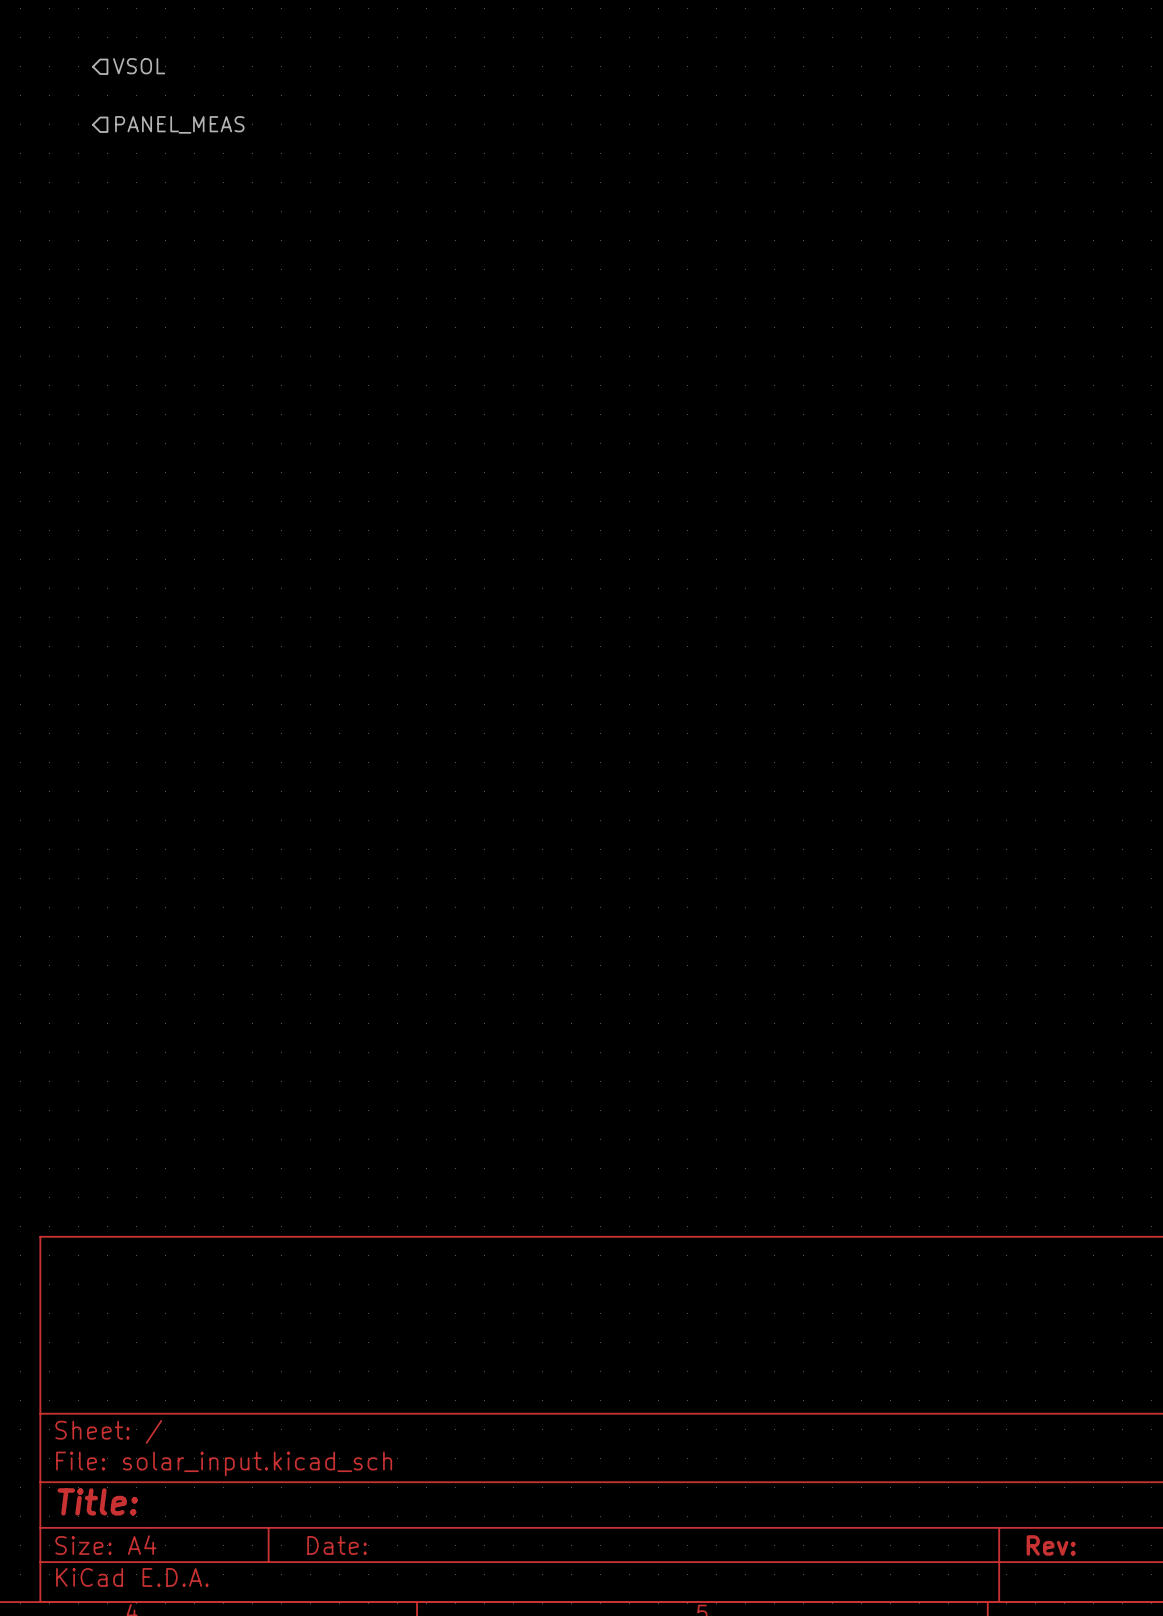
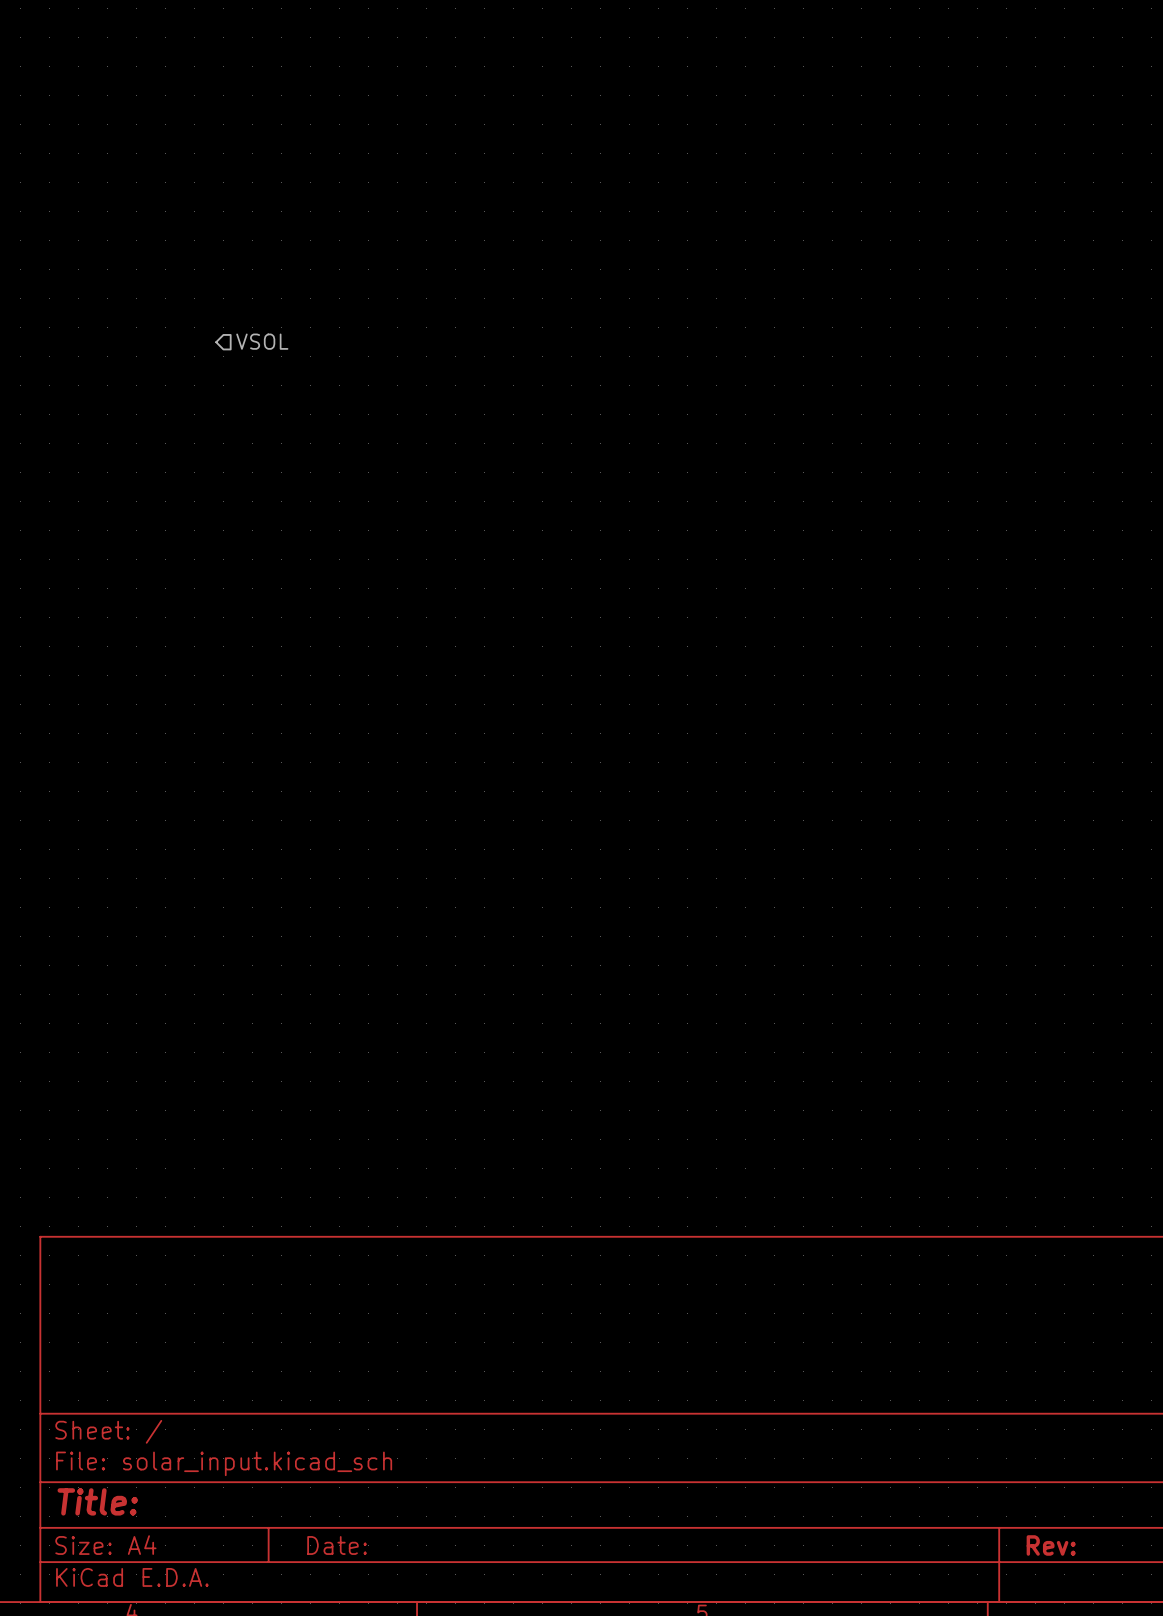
hierarchical label: VSOL (139, 66) -> none
hierarchical label: PANEL_MEAS (179, 124) -> none
hierarchical label: none -> VSOL (262, 341)

